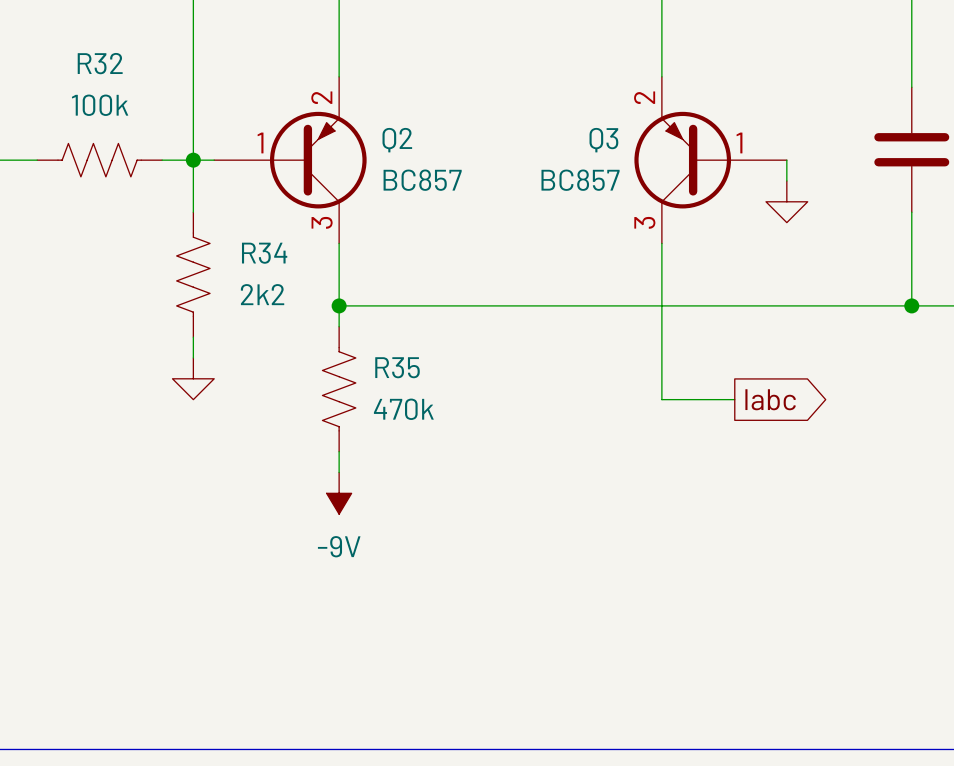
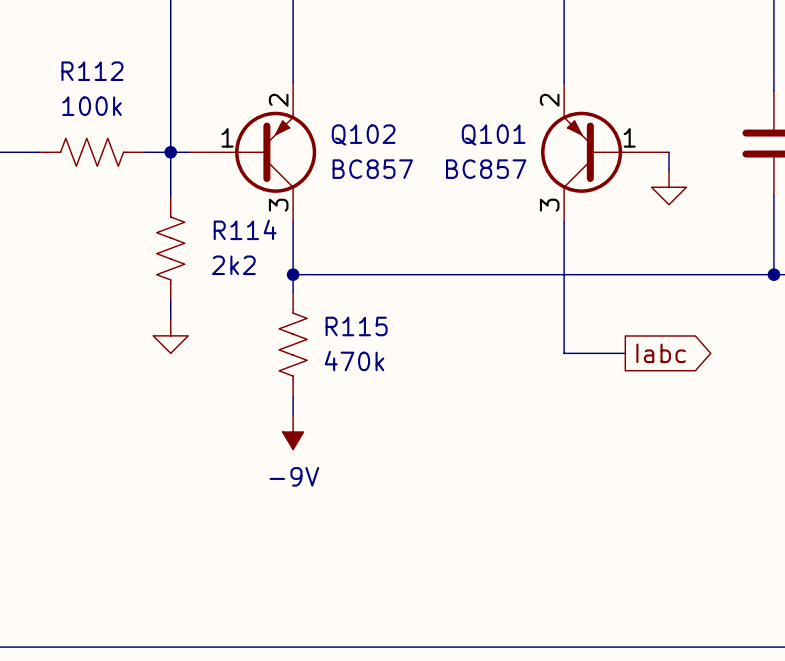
R32 name: R32 (100, 63) -> R112 (92, 71)
Q2 name: Q2 (397, 140) -> Q102 (363, 134)
Q3 name: Q3 (603, 140) -> Q101 (493, 134)
R34 name: R34 (264, 253) -> R114 (245, 229)
R35 name: R35 (397, 367) -> R115 (356, 326)

